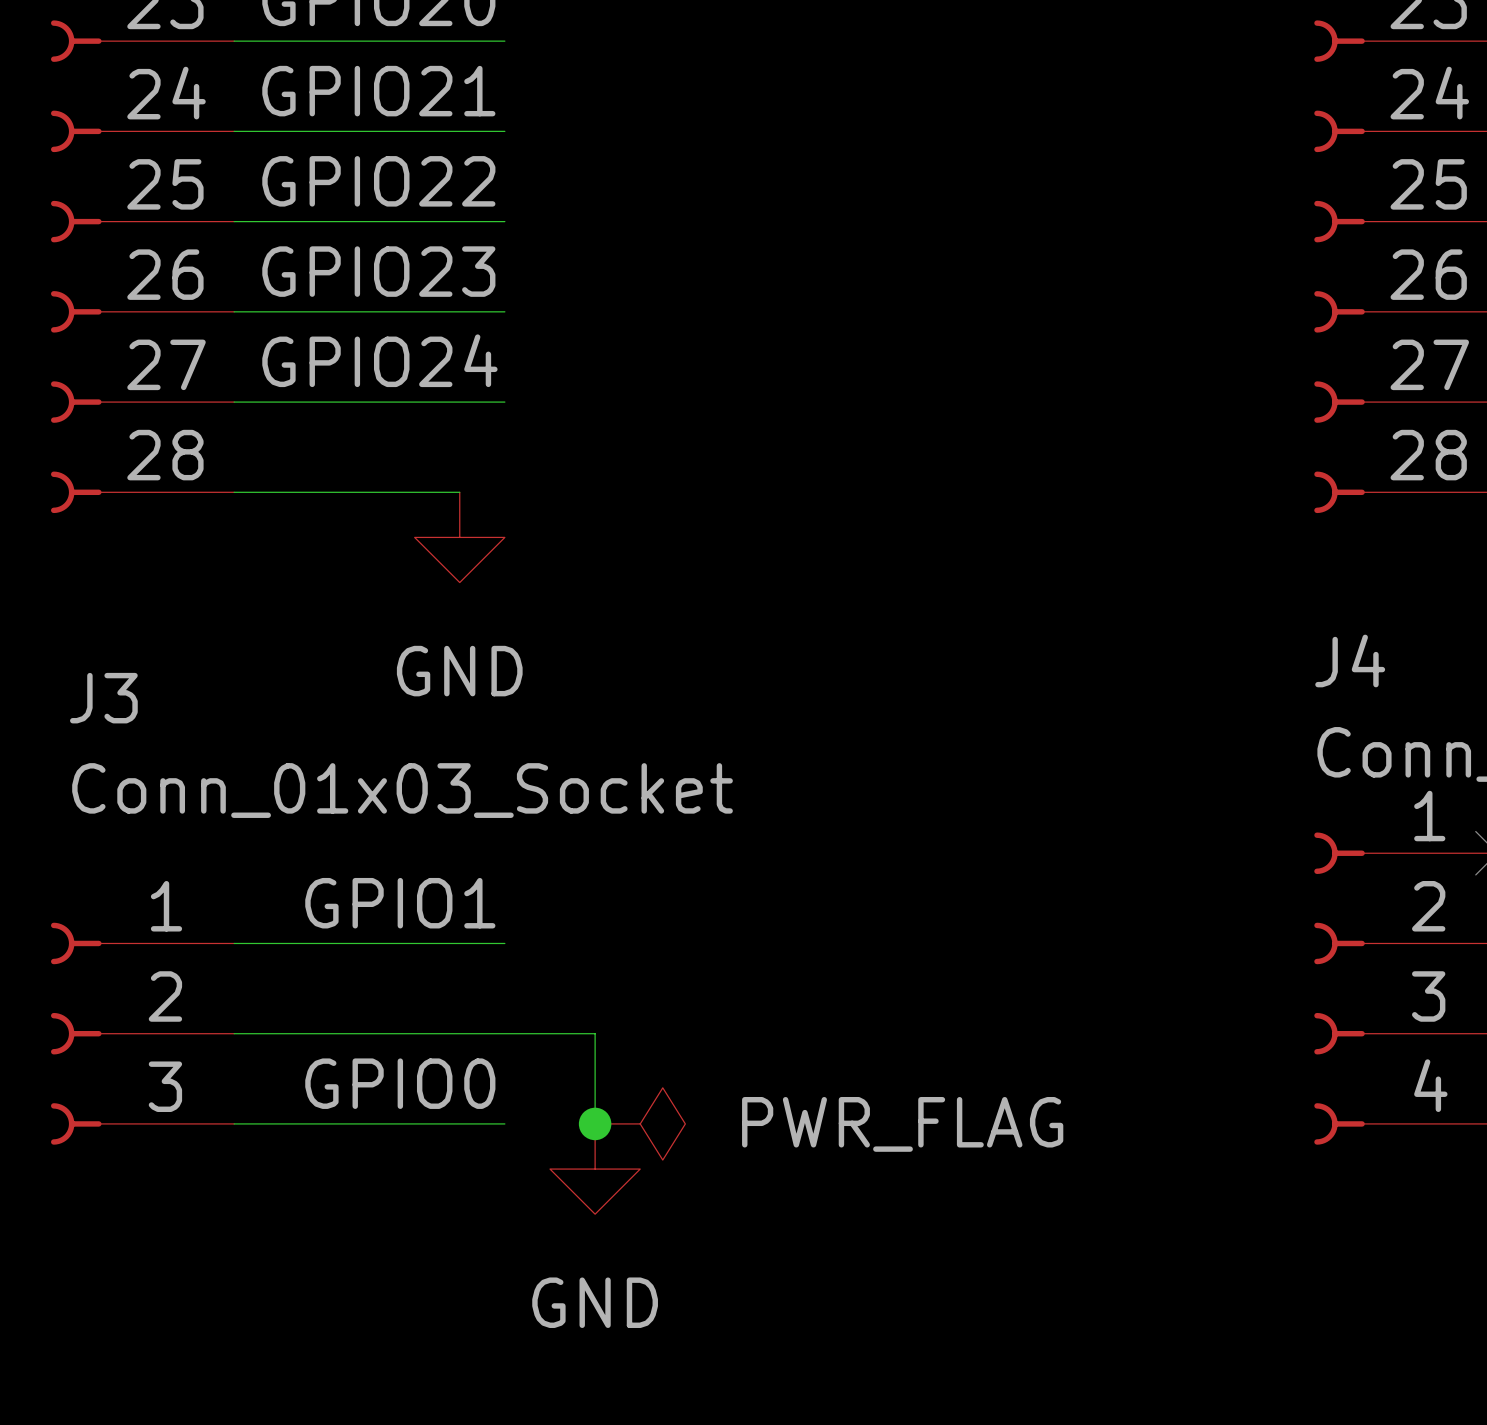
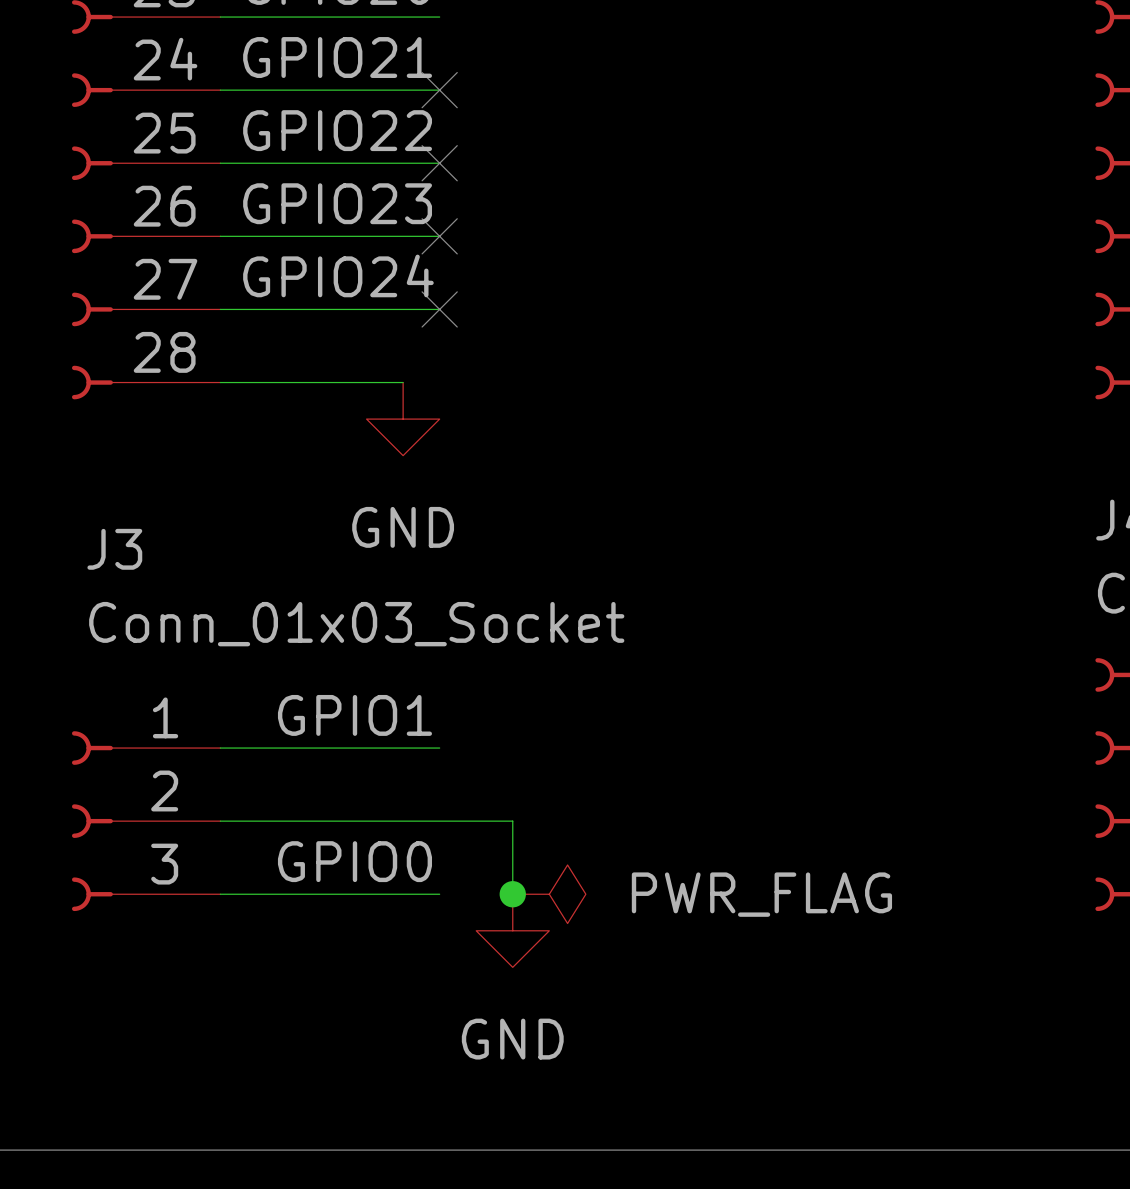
no-connect mark: none -> (439, 90)
no-connect mark: none -> (439, 163)
no-connect mark: none -> (439, 236)
no-connect mark: none -> (439, 309)

